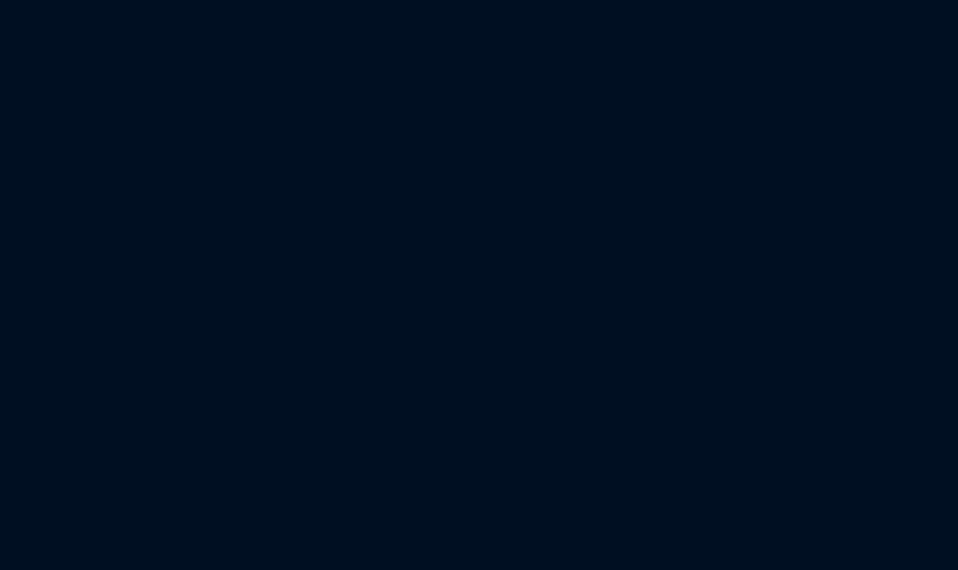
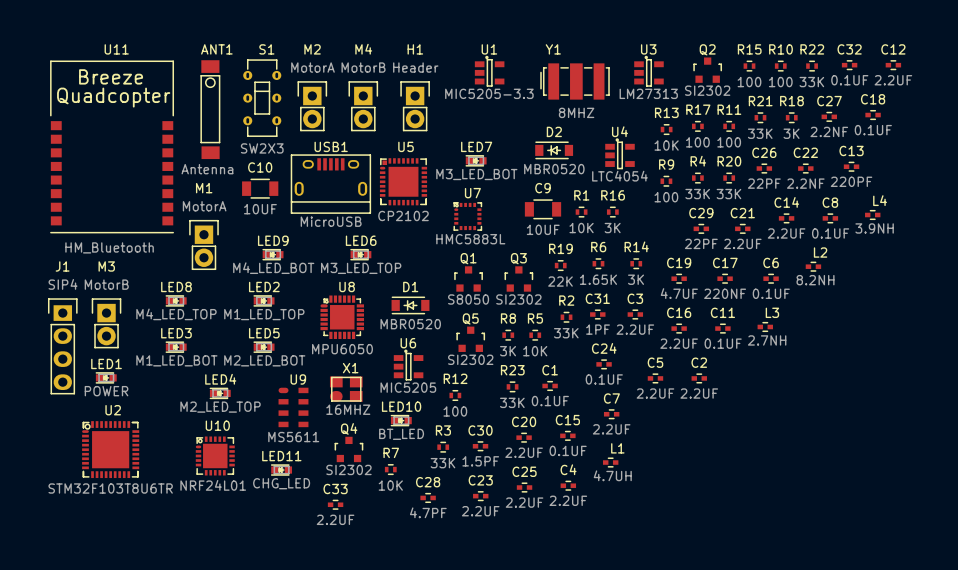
C32: none -> 0.1UF (849, 65)
C12: none -> 2.2UF (893, 65)
R15: none -> 100 (749, 66)
R10: none -> 100 (780, 66)
R22: none -> 33K (812, 66)
Q2: none -> SI2302 (707, 70)
U1: none -> MIC5205-3.3 (489, 71)
U3: none -> LM27313 (648, 71)
Y1: none -> 8MHZ (575, 81)
S1: none -> SW2X3 (262, 98)
M2: none -> MotorA (312, 106)
M4: none -> MotorB (363, 106)
H1: none -> Header (415, 106)
ANT1: none -> Antenna (210, 109)
C18: none -> 0.1UF (873, 115)
C27: none -> 2.2NF (829, 116)
R21: none -> 33K (760, 117)
R18: none -> 3K (791, 117)
R17: none -> 100 (697, 126)
R11: none -> 100 (729, 126)
R13: none -> 10K (666, 129)
U11: none -> HM_Bluetooth (112, 146)
D2: none -> MBR0520 (554, 150)
U4: none -> LTC4054 (619, 153)
LED7: none -> M3_LED_BOT (476, 160)
C13: none -> 220PF (851, 166)
C26: none -> 22PF (764, 168)
C22: none -> 2.2NF (805, 168)
R4: none -> 33K (697, 178)
R20: none -> 33K (729, 178)
U5: none -> CP2102 (403, 181)
R9: none -> 100 (666, 181)
USB1: none -> MicroUSB (330, 184)
C10: none -> 10UF (260, 188)
C9: none -> 10UF (543, 209)
R1: none -> 10K (581, 212)
R16: none -> 3K (612, 212)
L4: none -> 3.9NH (872, 215)
U7: none -> HMC5883L (467, 216)
C14: none -> 2.2UF (786, 218)
C8: none -> 0.1UF (830, 218)
C29: none -> 22PF (701, 228)
C21: none -> 2.2UF (742, 228)
M1: none -> MotorA (203, 244)
LED9: none -> M4_LED_BOT (272, 254)
LED6: none -> M3_LED_TOP (360, 254)
R6: none -> 1.65K (598, 263)
R14: none -> 3K (636, 263)
R19: none -> 22K (560, 265)
L2: none -> 8.2NH (813, 266)
Q1: none -> S8050 (468, 278)
Q3: none -> SI2302 (518, 278)
C19: none -> 4.7UF (679, 278)
C17: none -> 220NF (725, 278)
C6: none -> 0.1UF (771, 278)
LED8: none -> M4_LED_TOP (176, 300)
LED2: none -> M1_LED_TOP (263, 300)
D1: none -> MBR0520 (410, 305)
C31: none -> 1PF (597, 314)
C3: none -> 2.2UF (635, 314)
U8: none -> MPU6050 (342, 317)
R2: none -> 33K (566, 317)
M3: none -> MotorB (106, 323)
L3: none -> 2.7NH (765, 326)
C16: none -> 2.2UF (679, 328)
C11: none -> 0.1UF (722, 328)
R8: none -> 3K (508, 335)
R5: none -> 10K (535, 335)
Q5: none -> SI2302 (470, 339)
J1: none -> SIP4 (62, 346)
LED3: none -> M1_LED_BOT (176, 347)
LED5: none -> M2_LED_BOT (263, 347)
C24: none -> 0.1UF (604, 364)
U6: none -> MIC5205 (408, 365)
LED1: none -> POWER (106, 377)
C5: none -> 2.2UF (655, 378)
C2: none -> 2.2UF (699, 378)
C1: none -> 0.1UF (550, 385)
R23: none -> 33K (512, 386)
X1: none -> 16MHZ (346, 389)
LED4: none -> M2_LED_TOP (220, 393)
R12: none -> 100 (455, 395)
U9: none -> MS5611 (293, 407)
C7: none -> 2.2UF (611, 414)
LED10: none -> BT_LED (401, 420)
C15: none -> 0.1UF (567, 435)
C20: none -> 2.2UF (524, 437)
C30: none -> 1.5PF (480, 446)
R3: none -> 33K (443, 447)
U2: none -> STM32F103T8U6TR (110, 449)
Q4: none -> SI2302 (348, 449)
U10: none -> NRF24L01 (215, 455)
L1: none -> 4.7UH (610, 462)
R7: none -> 10K (390, 469)
LED11: none -> CHG_LED (281, 470)
C4: none -> 2.2UF (568, 485)
C25: none -> 2.2UF (524, 487)
C23: none -> 2.2UF (480, 496)
C28: none -> 4.7PF (428, 497)
C33: none -> 2.2UF (335, 504)

